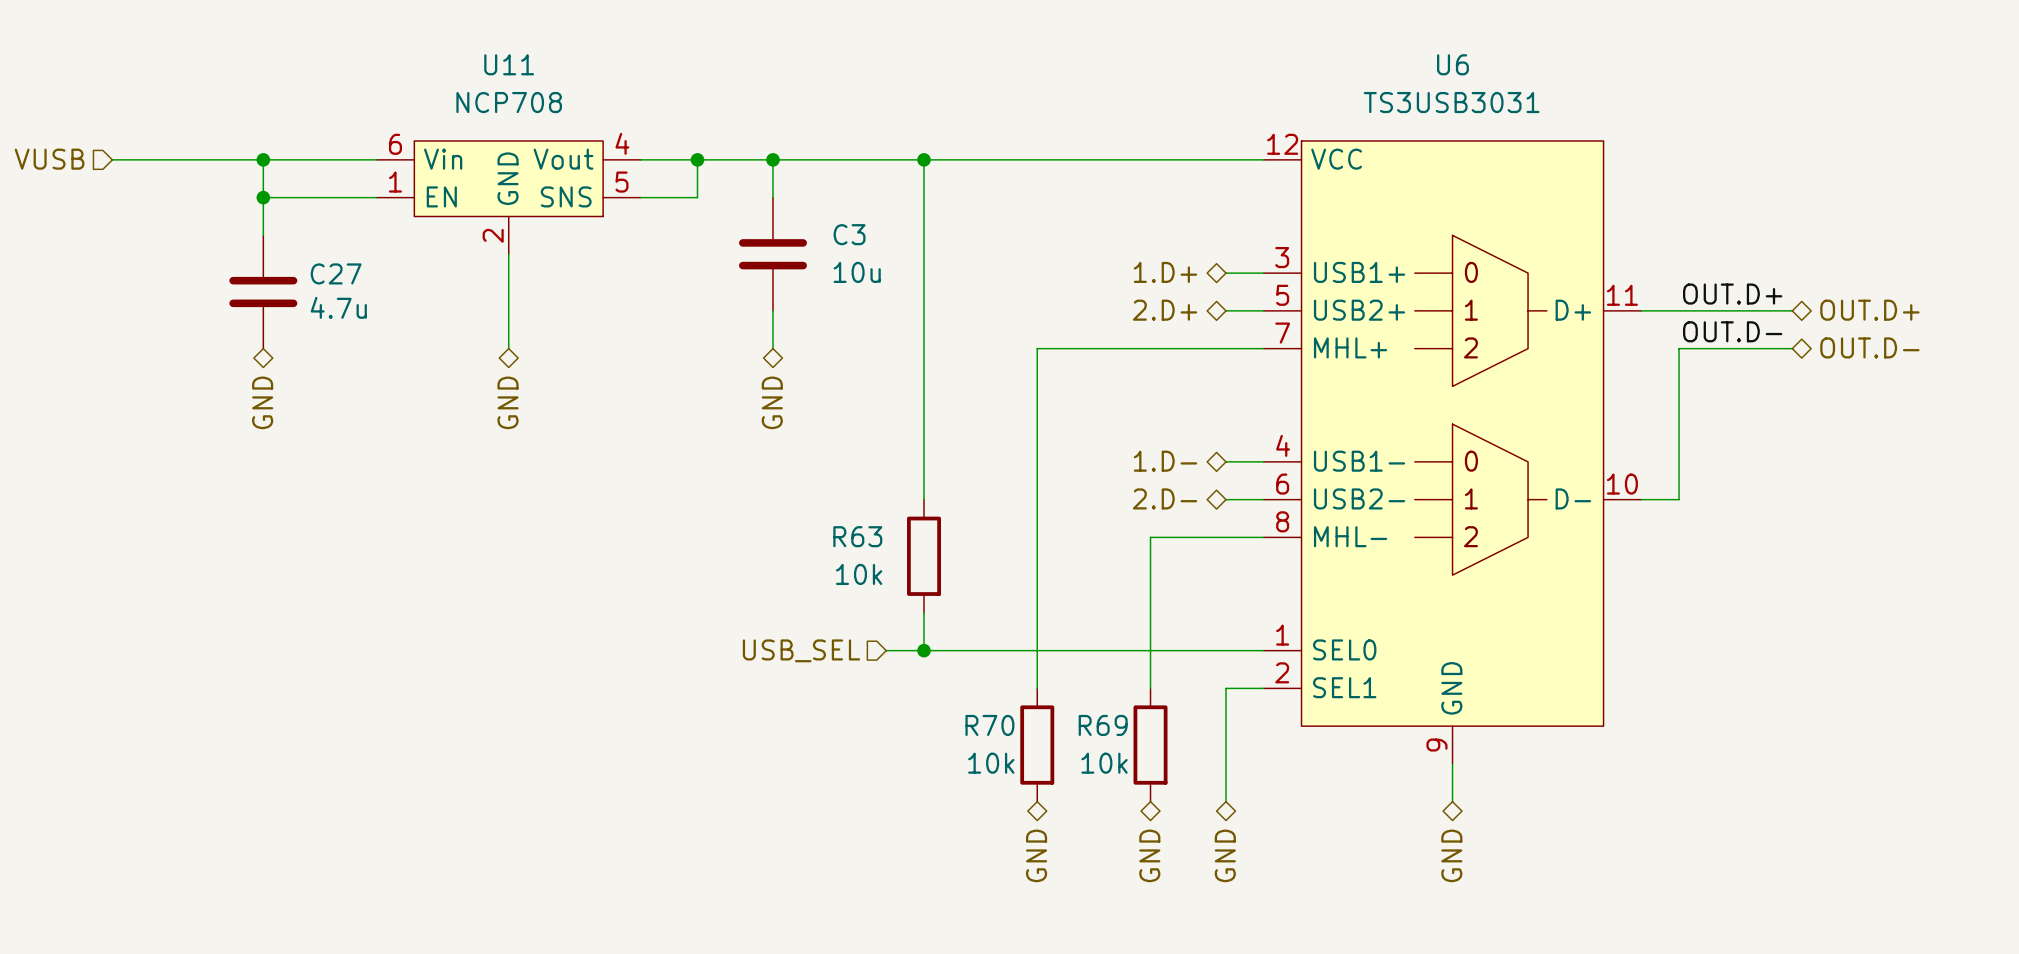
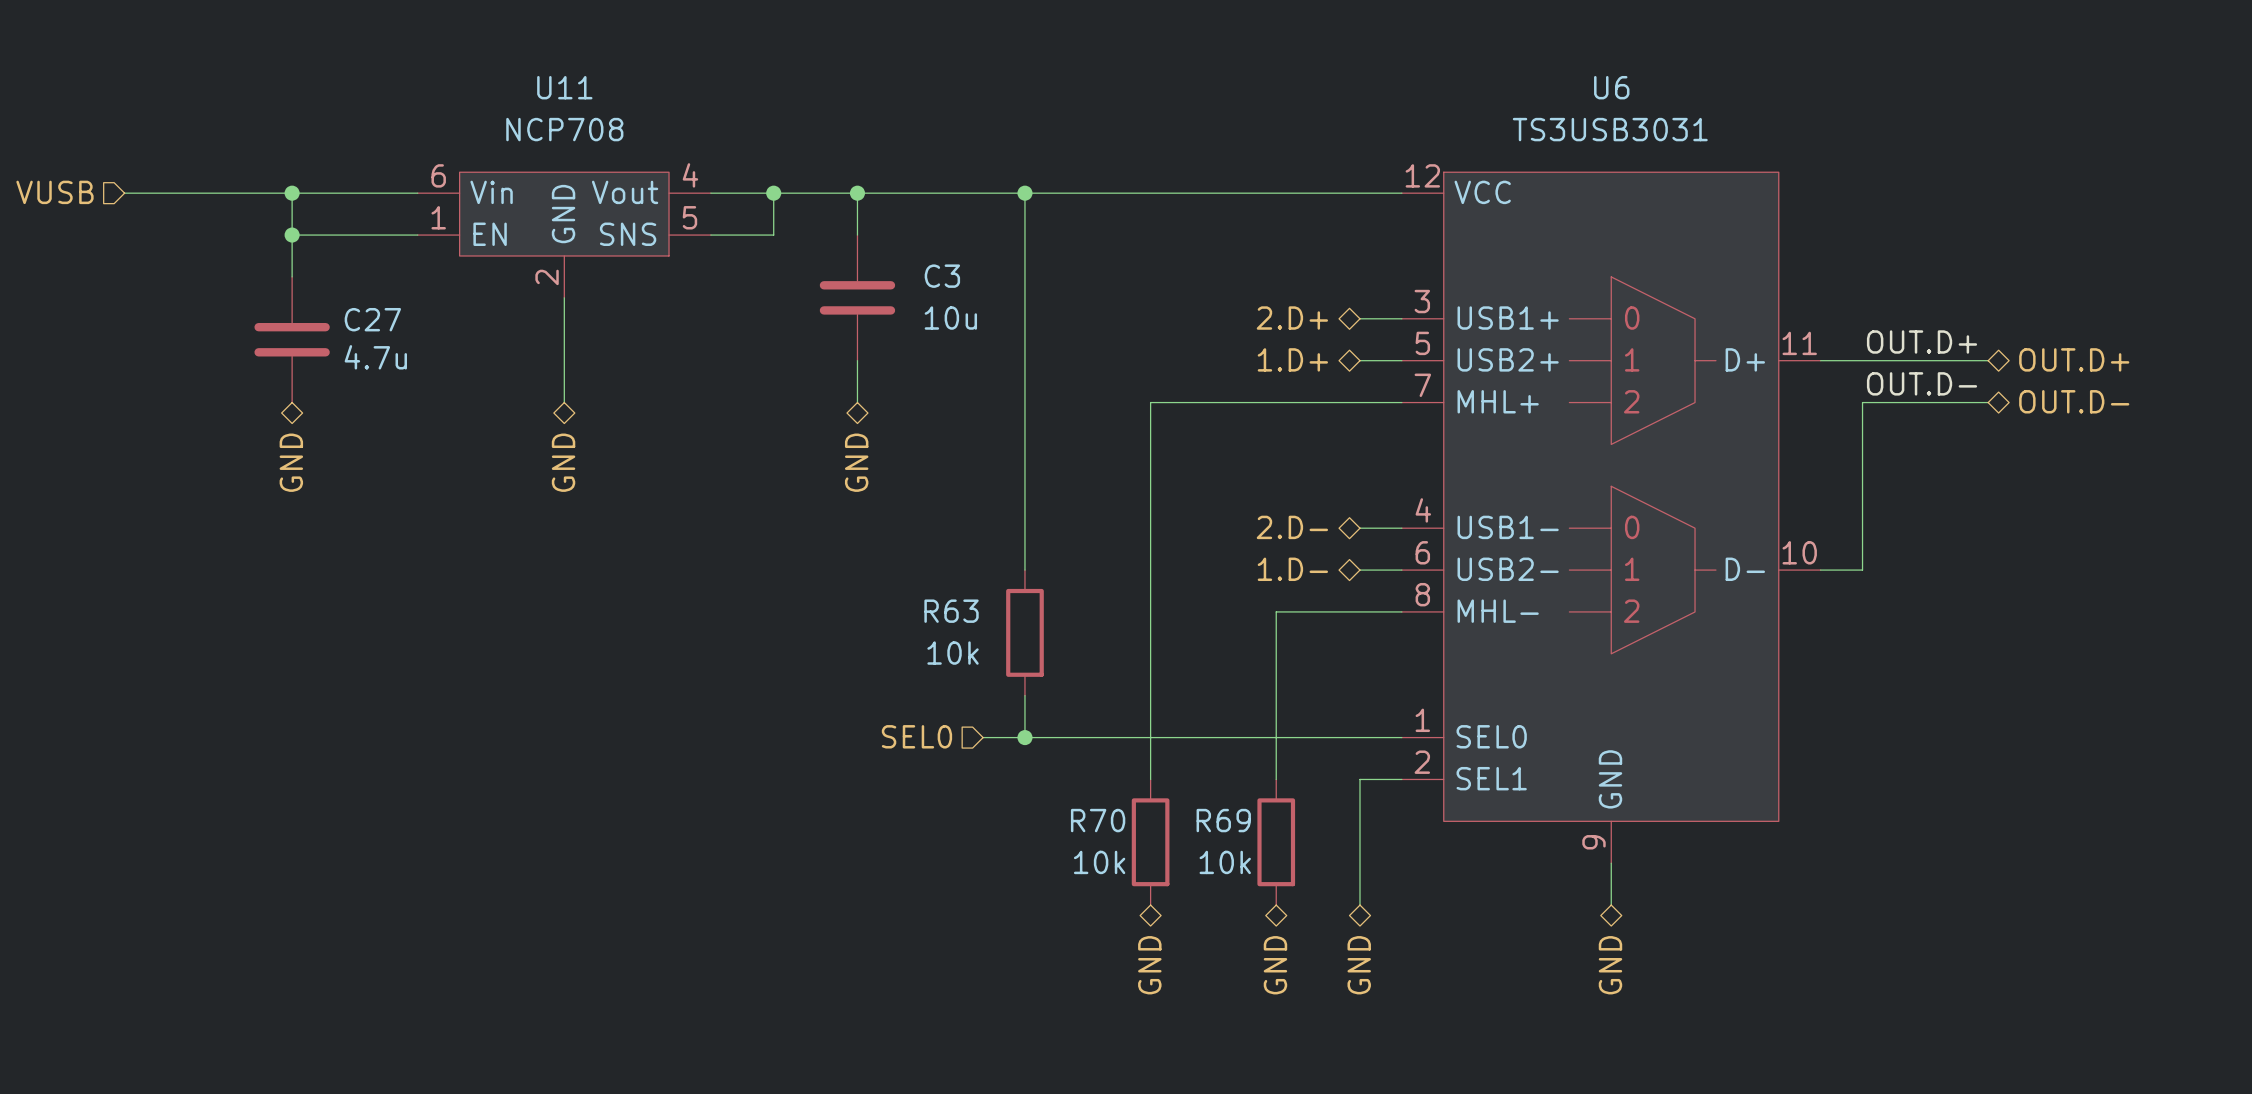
hierarchical label: 1.D+ (1165, 272) -> 2.D+ (1292, 318)
hierarchical label: 2.D+ (1165, 310) -> 1.D+ (1292, 359)
hierarchical label: 1.D- (1165, 461) -> 2.D- (1292, 527)
hierarchical label: 2.D- (1165, 498) -> 1.D- (1292, 569)
hierarchical label: USB_SEL (801, 650) -> SEL0 (916, 736)

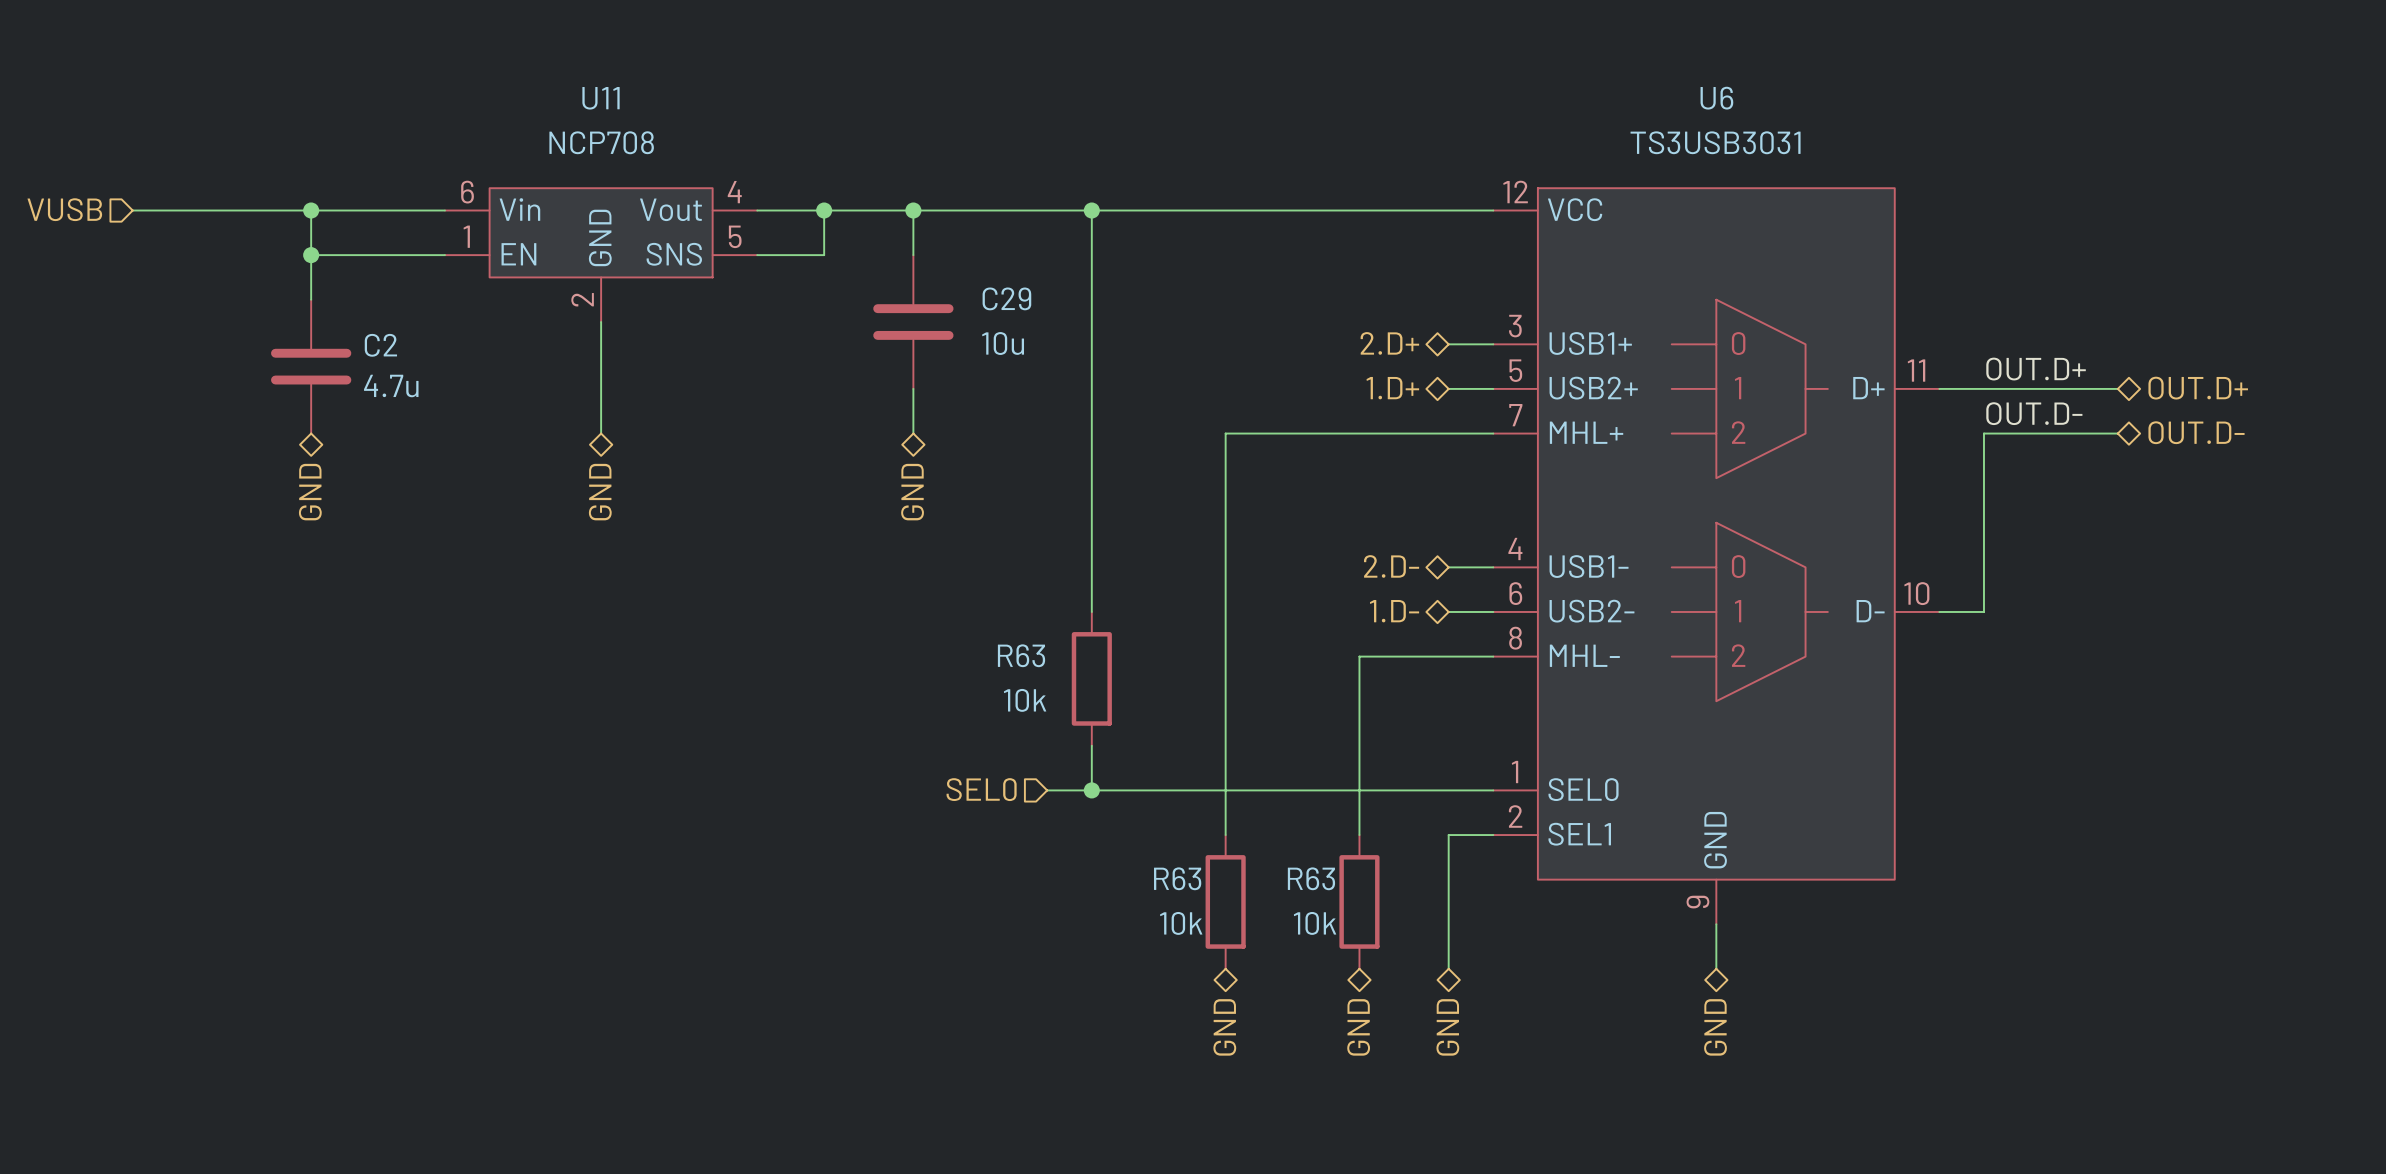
C3 name: C3 (942, 276) -> C29 (1006, 298)
C27 name: C27 (372, 319) -> C2 (380, 345)
R70 name: R70 (1098, 820) -> R63 (1177, 878)
R69 name: R69 (1223, 820) -> R63 (1311, 878)

